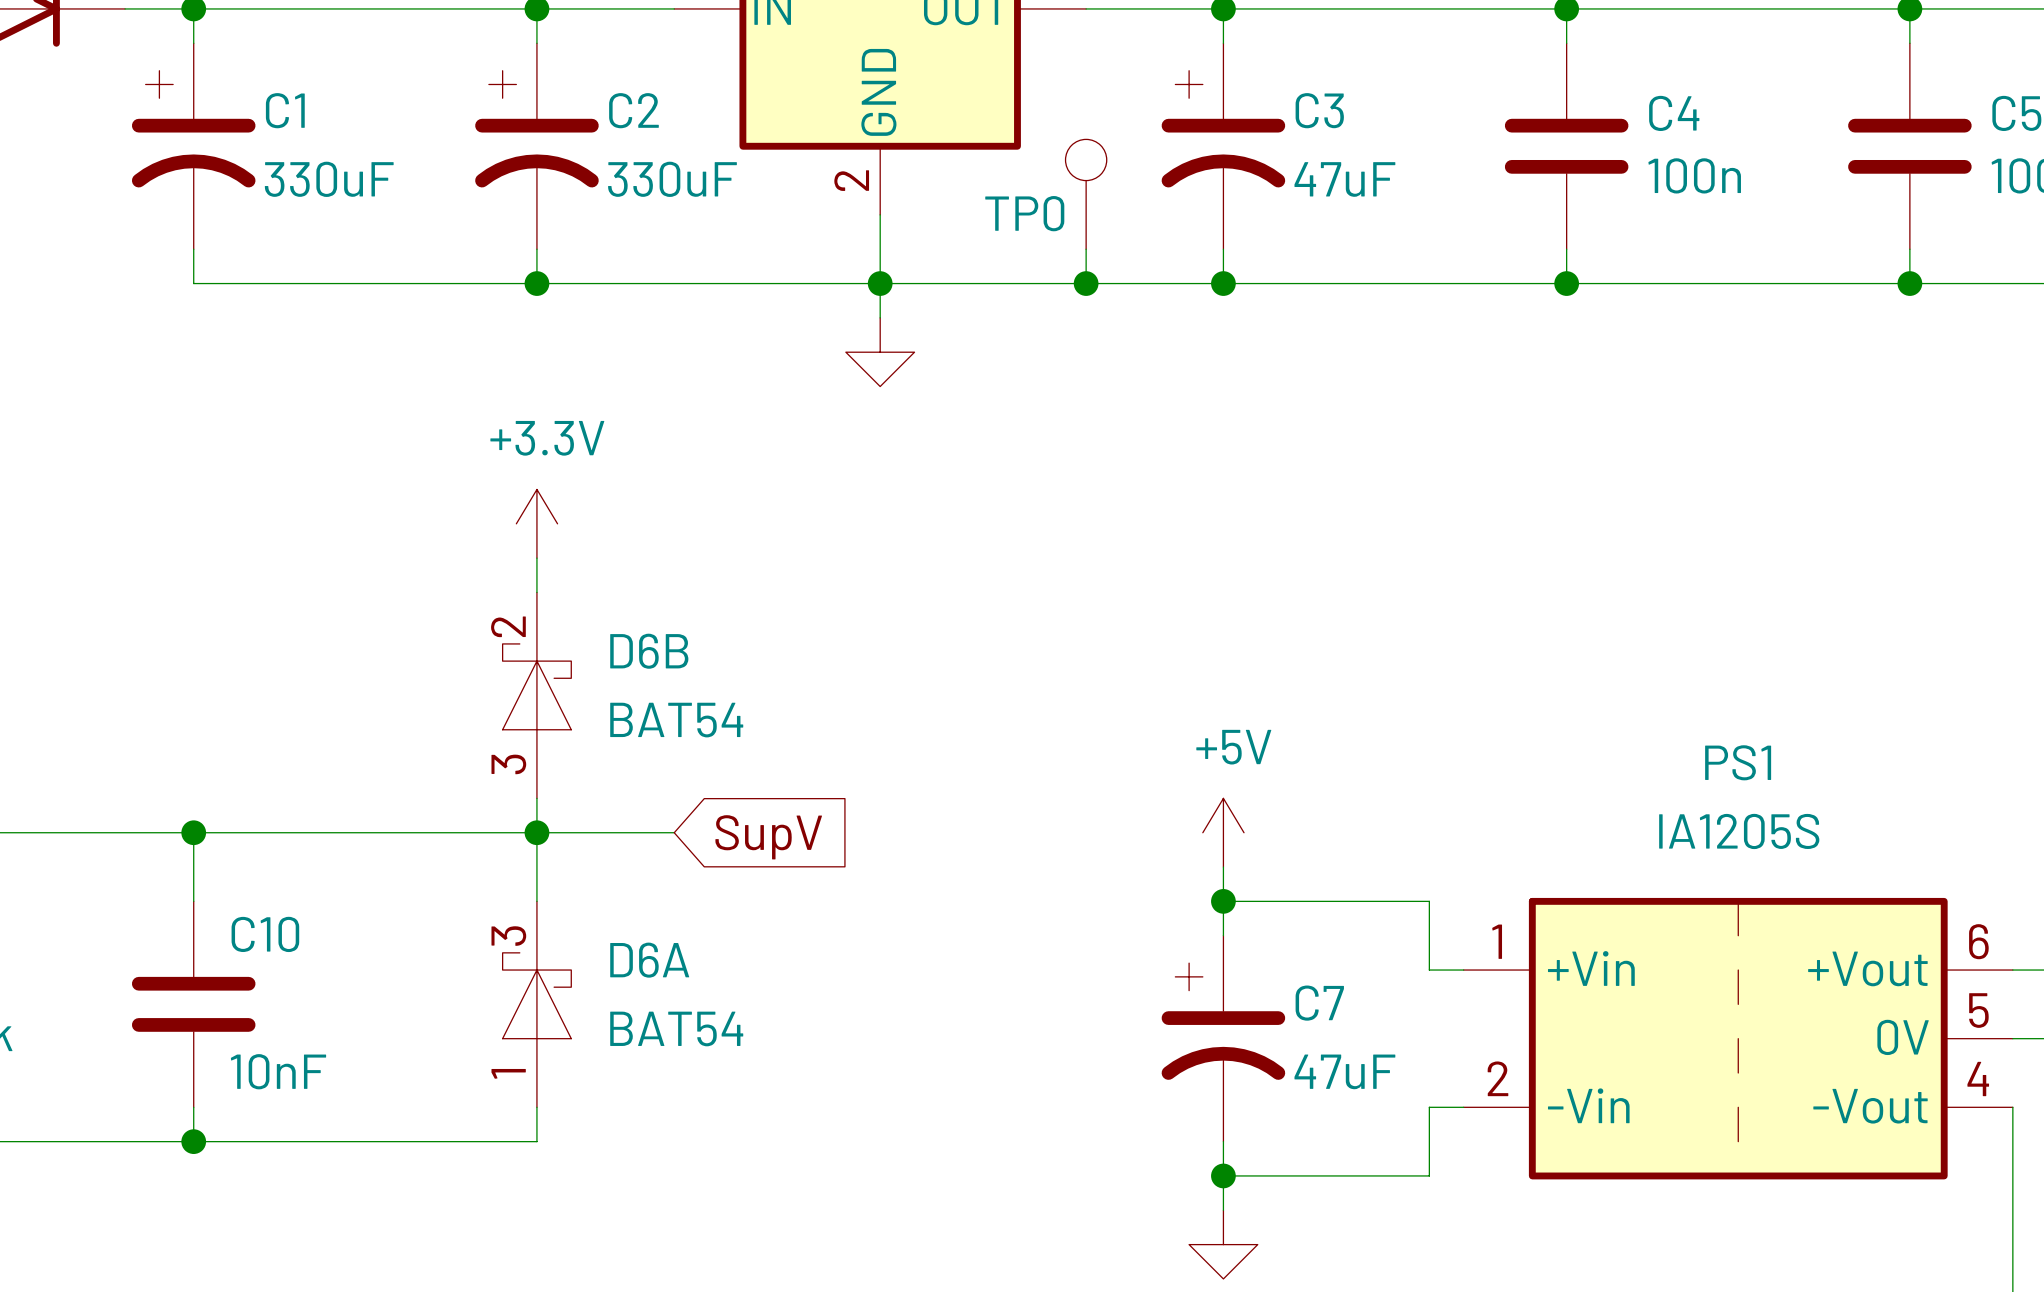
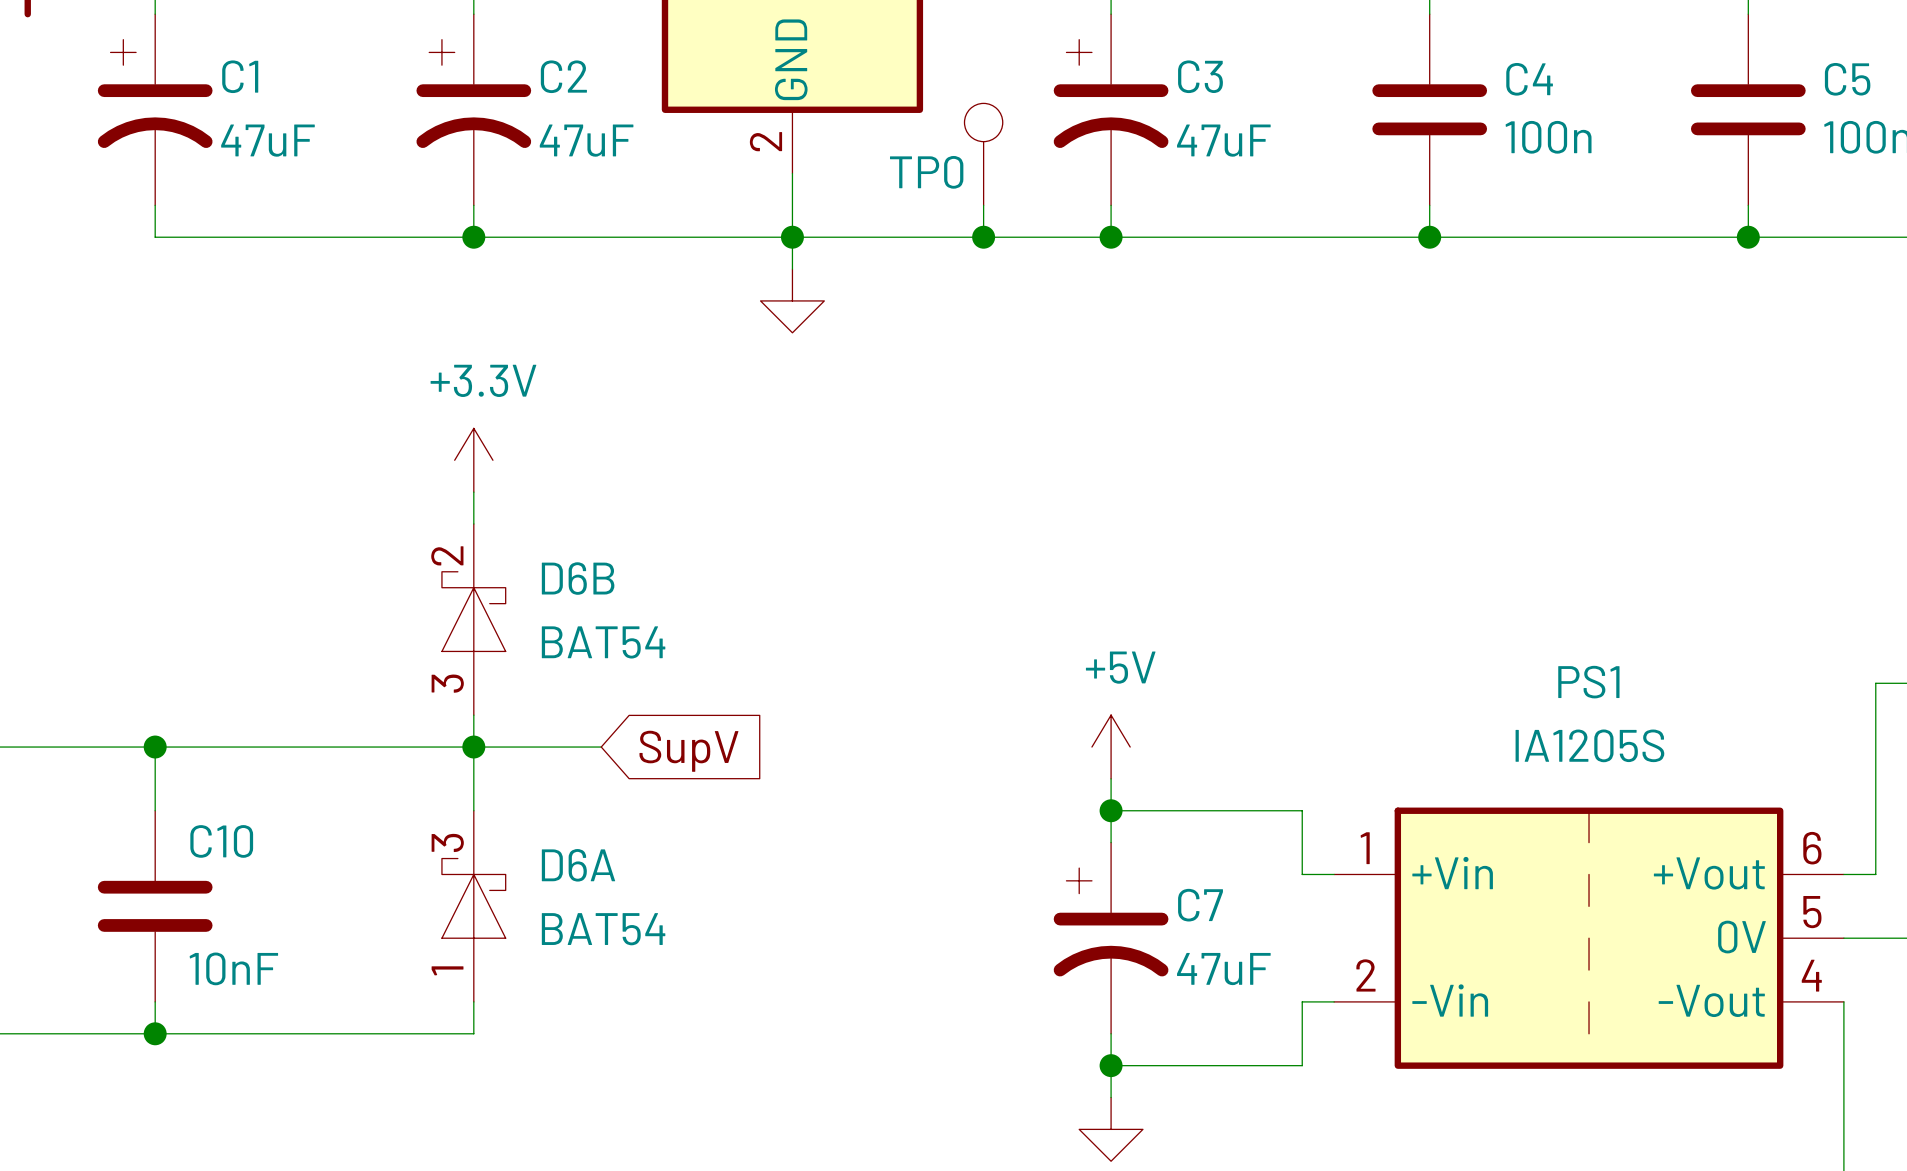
C1 value: 330uF (329, 179) -> 47uF (267, 140)
C2 value: 330uF (672, 179) -> 47uF (586, 140)

